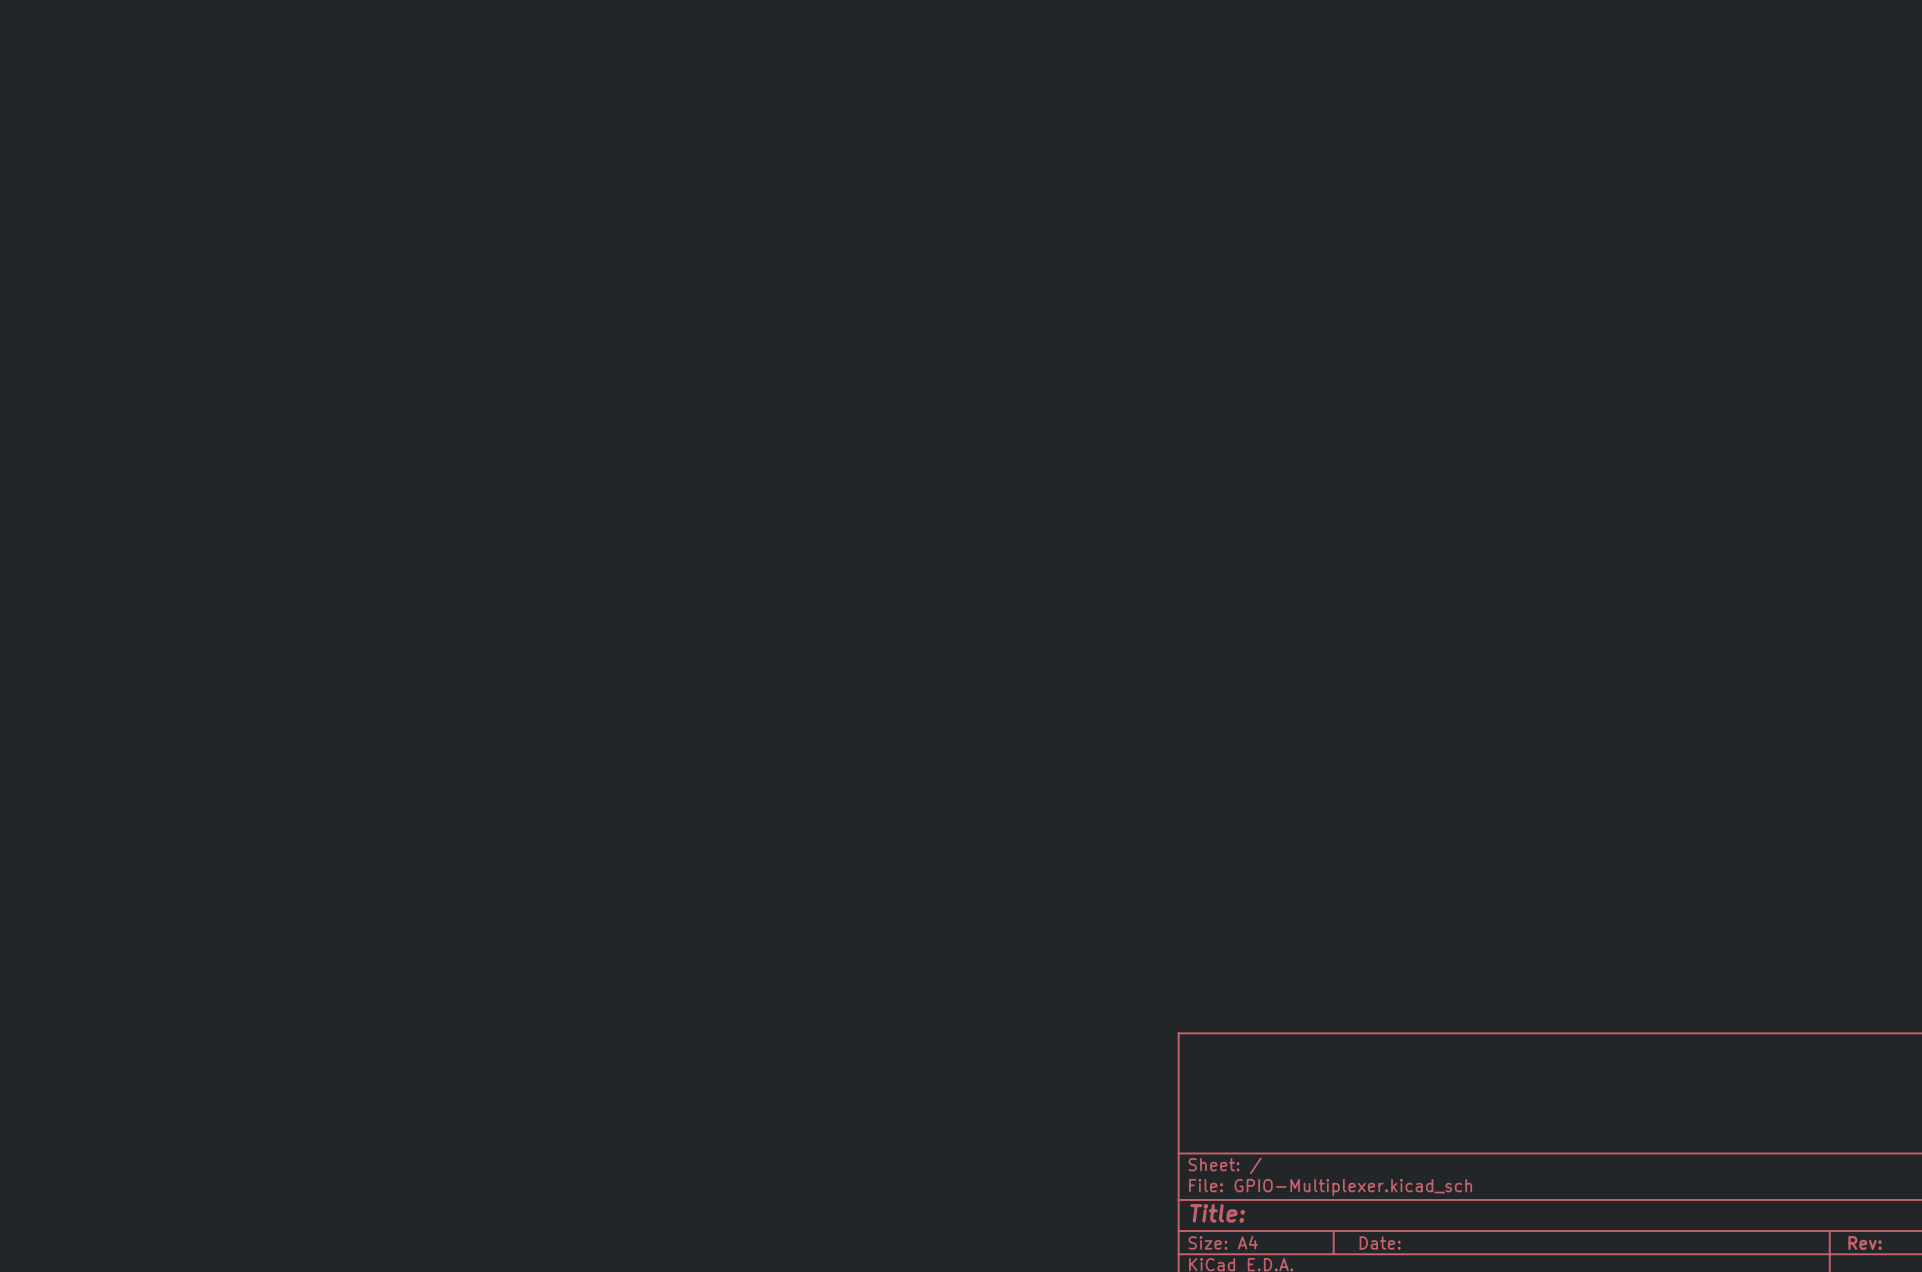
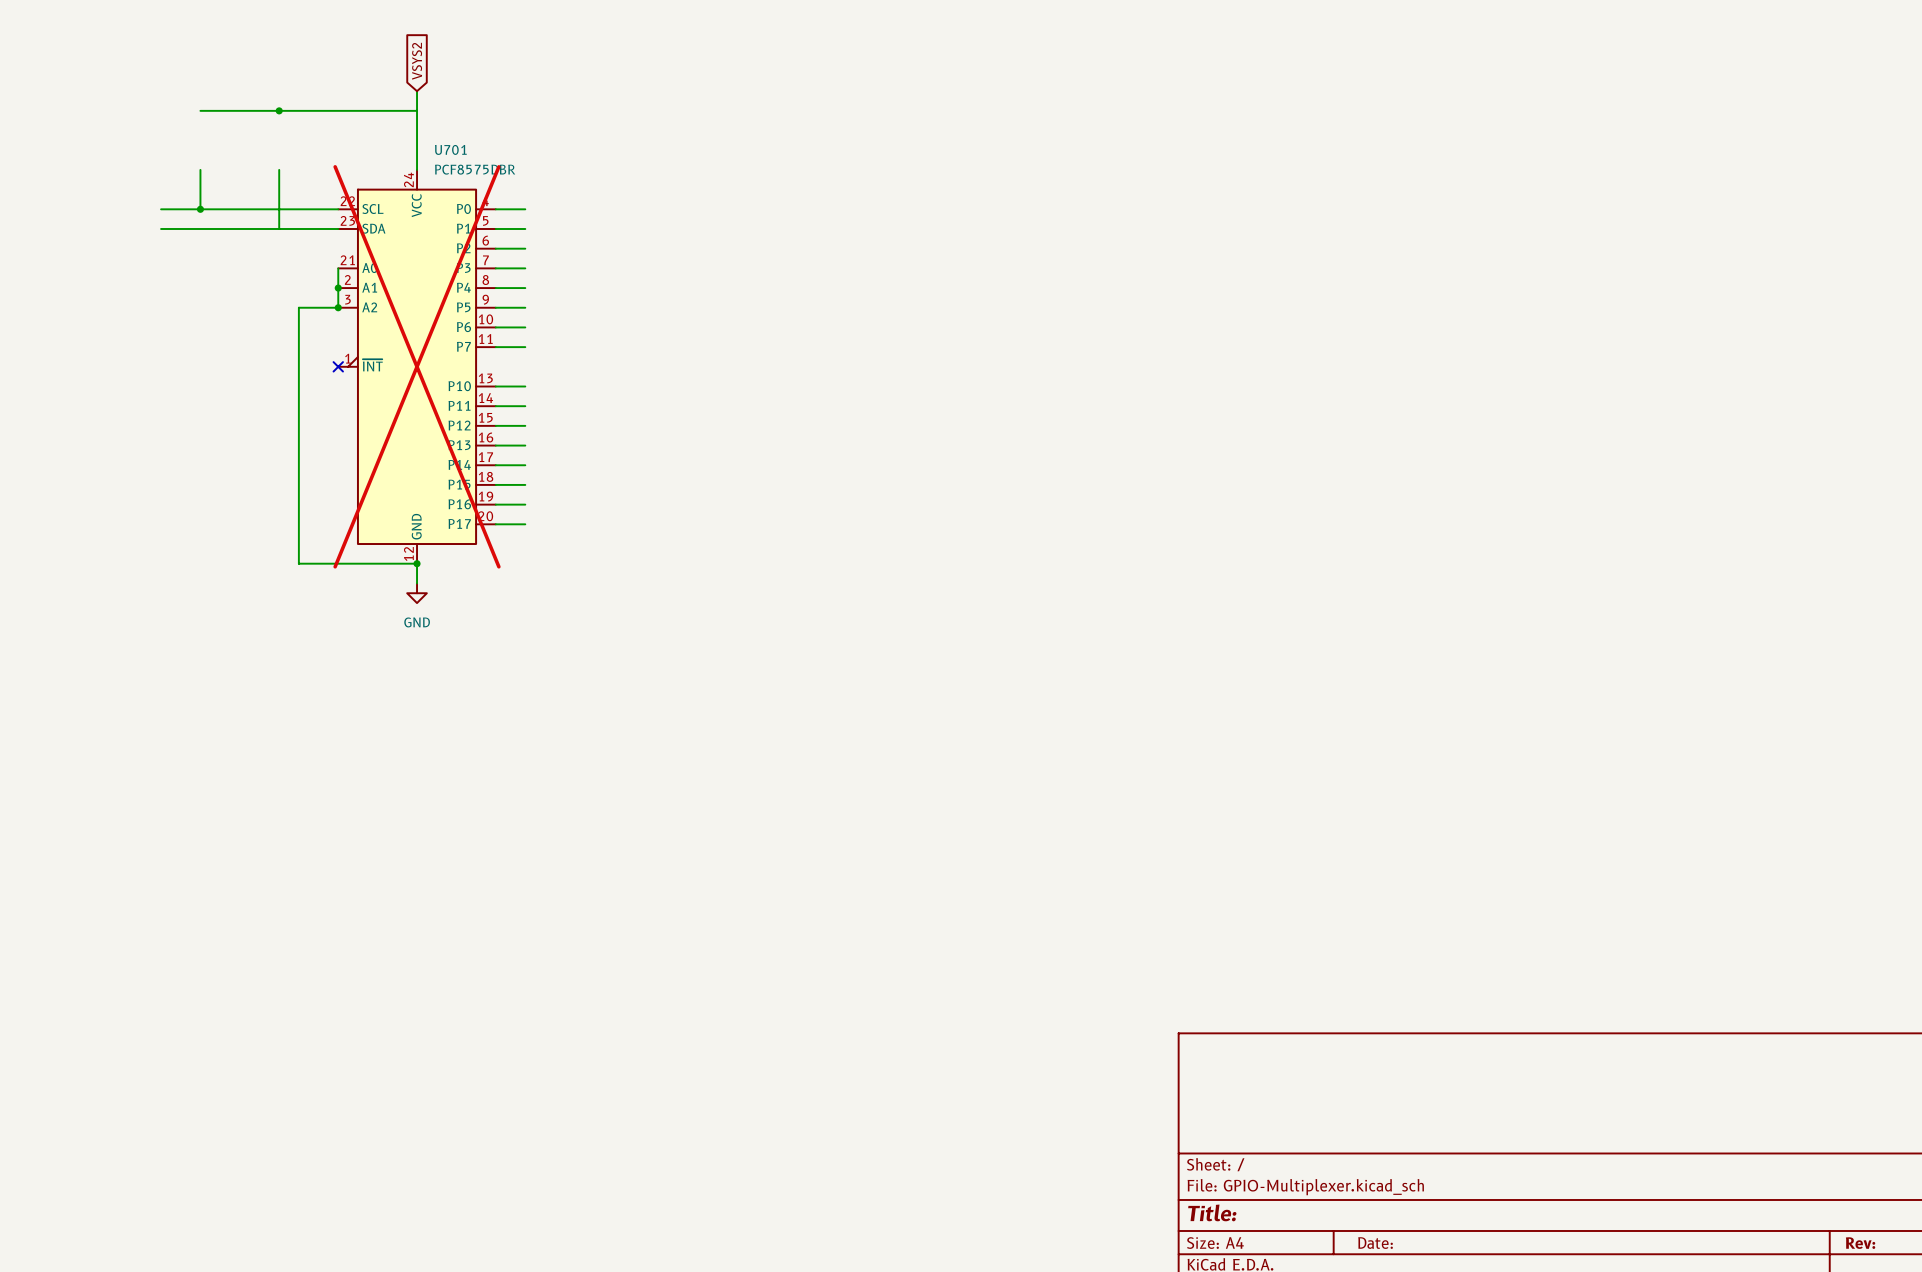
global label: none -> VSYS2 (417, 61)
wire: none -> (417, 91) (417, 169)
wire: none -> (200, 110) (417, 110)
junction: none -> (279, 110)
wire: none -> (200, 169) (200, 209)
wire: none -> (279, 169) (279, 228)
wire: none -> (161, 209) (338, 209)
junction: none -> (200, 209)
wire: none -> (495, 209) (525, 209)
wire: none -> (161, 228) (338, 228)
wire: none -> (495, 228) (525, 228)
wire: none -> (495, 248) (525, 248)
wire: none -> (338, 268) (338, 307) (298, 307) (298, 563) (417, 563) (417, 583)
wire: none -> (495, 268) (525, 268)
junction: none -> (338, 288)
wire: none -> (495, 288) (525, 288)
junction: none -> (338, 307)
wire: none -> (495, 307) (525, 307)
wire: none -> (495, 327) (525, 327)
wire: none -> (495, 347) (525, 347)
no-connect mark: none -> (338, 366)
U701: none -> PCF8575DBR (417, 366)
wire: none -> (495, 386) (525, 386)
wire: none -> (495, 406) (525, 406)
wire: none -> (495, 425) (525, 425)
wire: none -> (495, 445) (525, 445)
wire: none -> (495, 465) (525, 465)
wire: none -> (495, 484) (525, 484)
wire: none -> (495, 504) (525, 504)
wire: none -> (495, 524) (525, 524)
junction: none -> (417, 563)
power symbol: none -> GND (417, 593)

